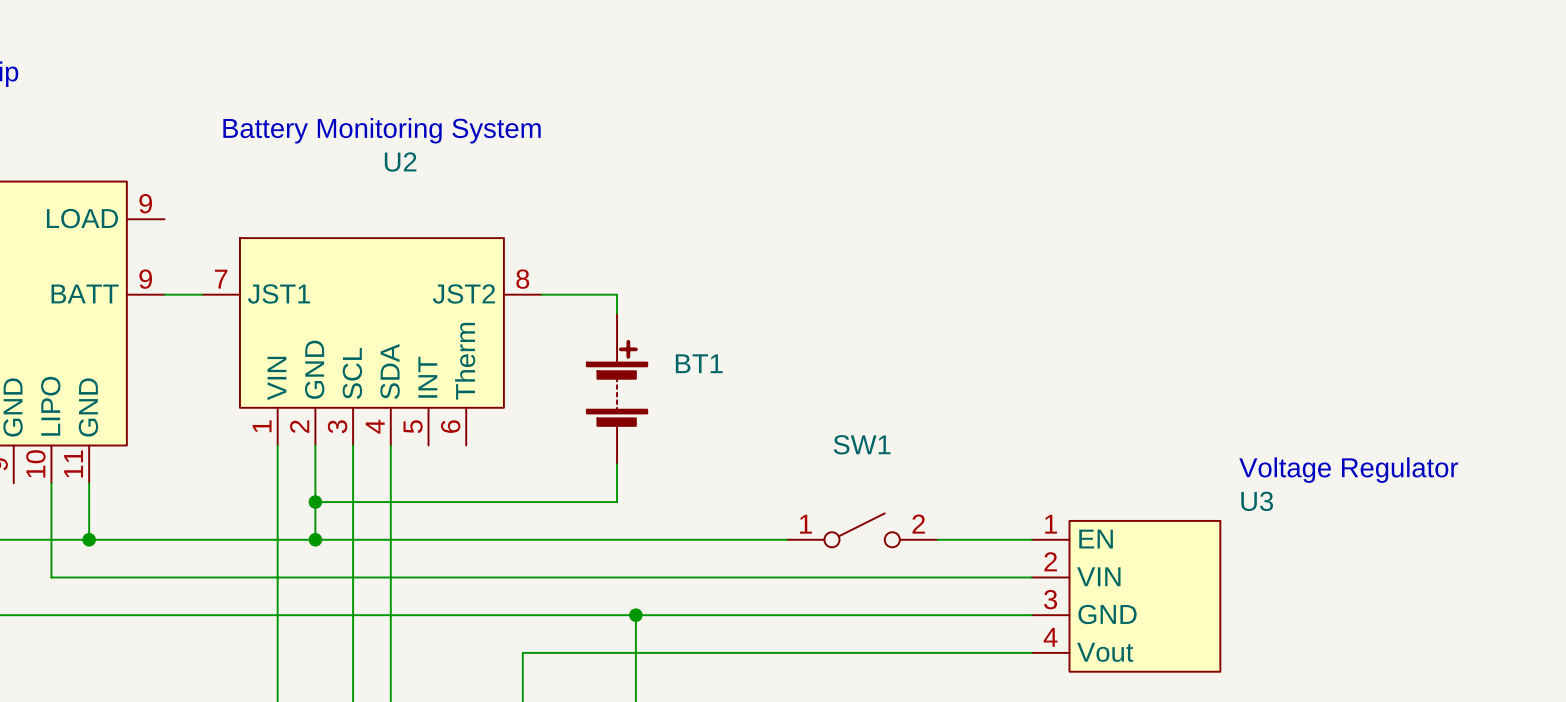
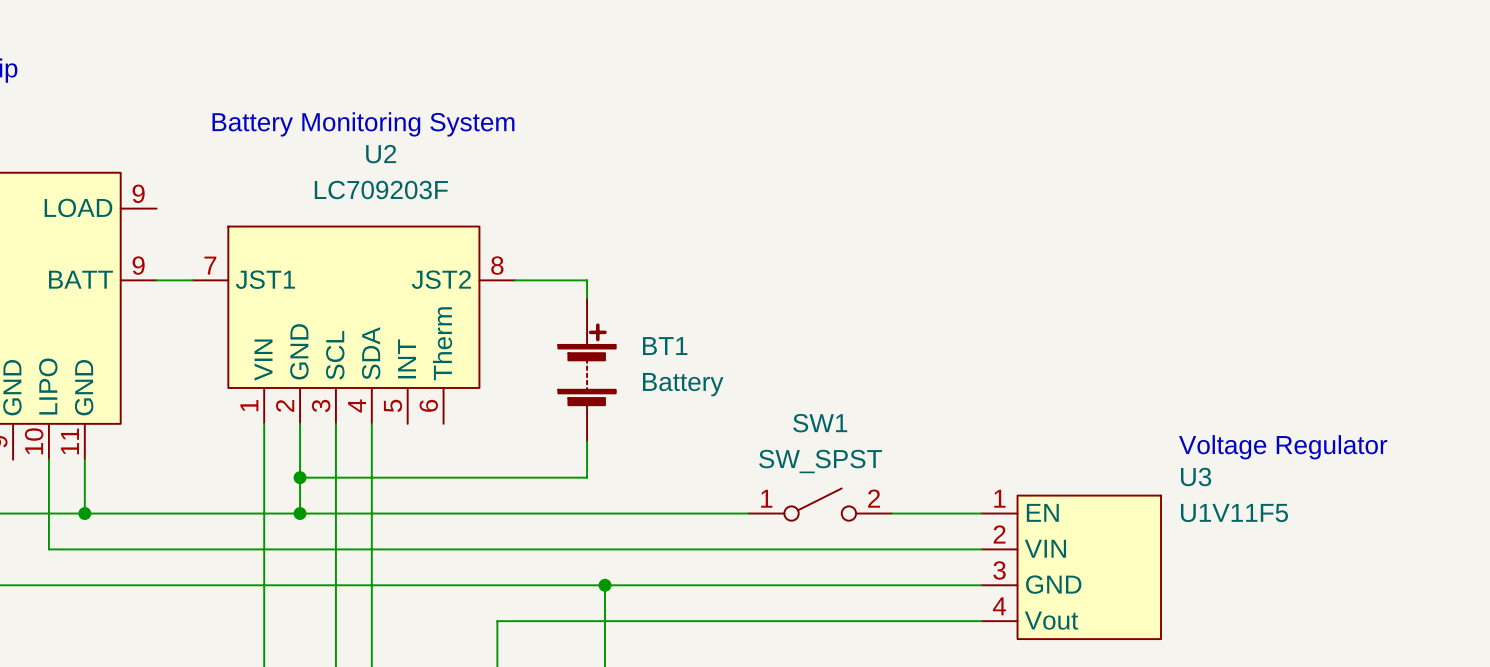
U2 value: none -> LC709203F (381, 190)
BT1 value: none -> Battery (683, 384)
SW1 value: none -> SW_SPST (820, 461)
U3 value: none -> U1V11F5 (1234, 512)

